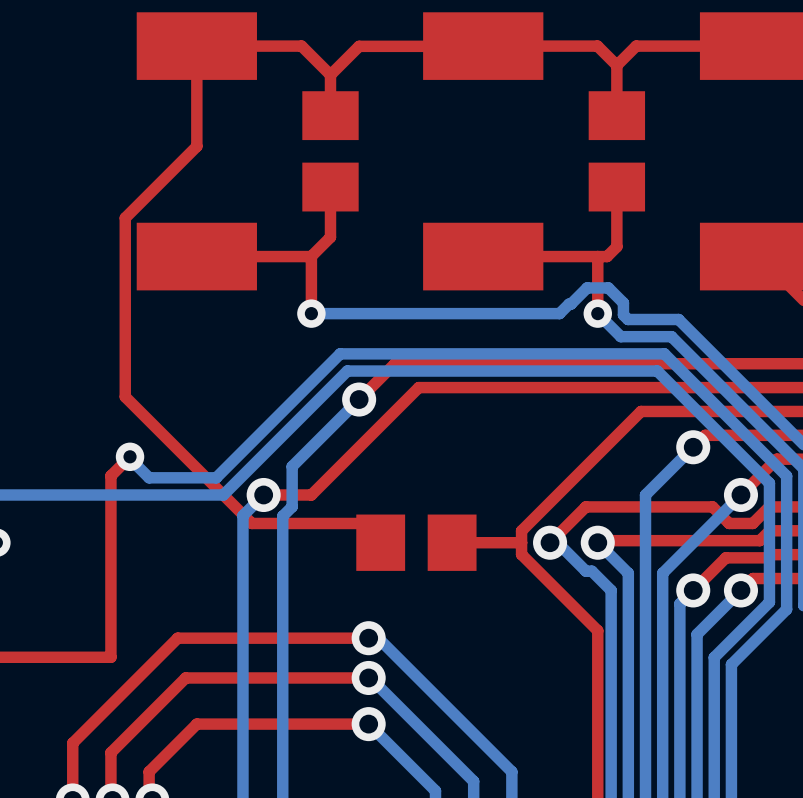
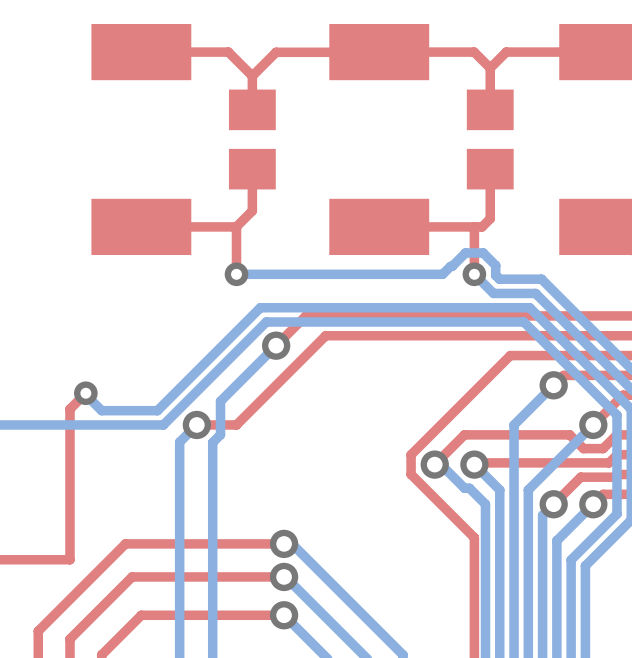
top track: (196, 46) (196, 146) (125, 218) (125, 396) (251, 523) (361, 523) (380, 542) -> none
part: (416, 542) -> none
top track: (521, 542) (452, 542) -> none

